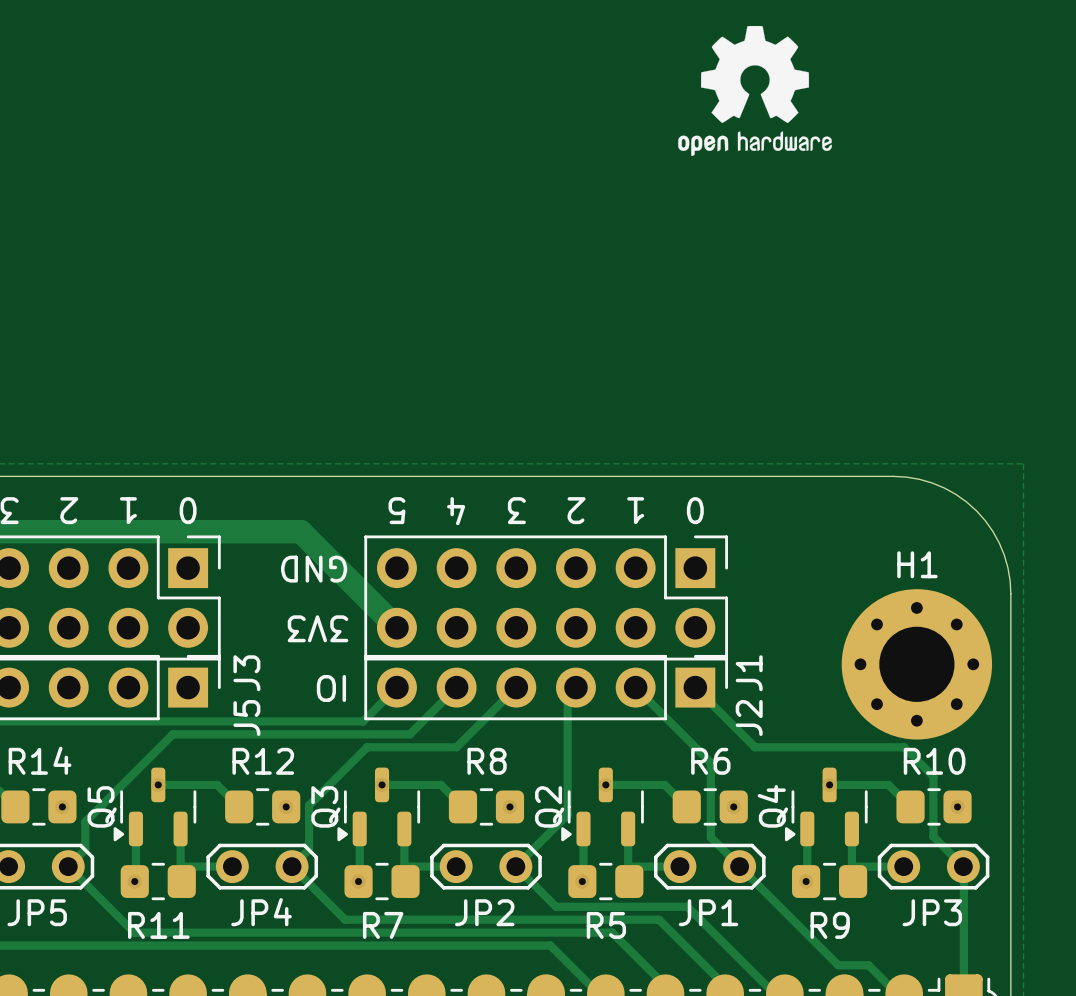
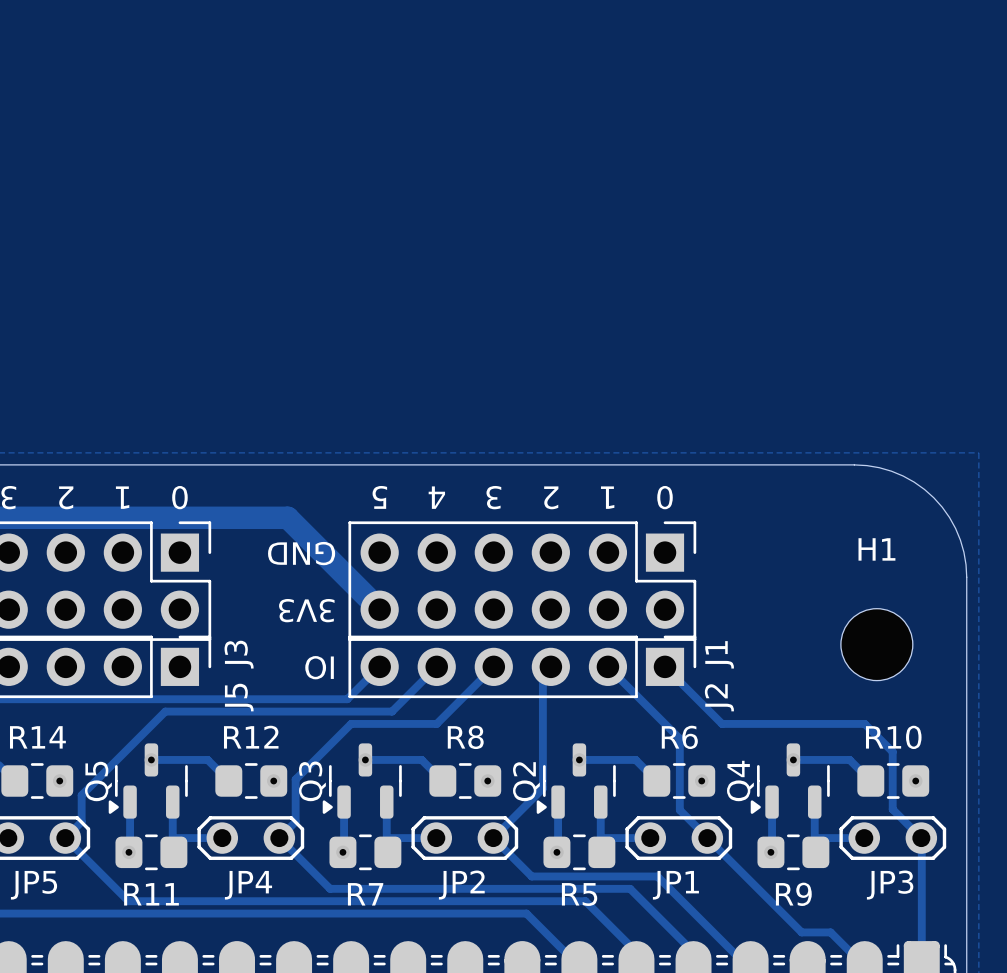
drawing: [678, 25, 832, 157] -> none
H1 footprint: [841, 589, 993, 740] -> [840, 608, 913, 681]

